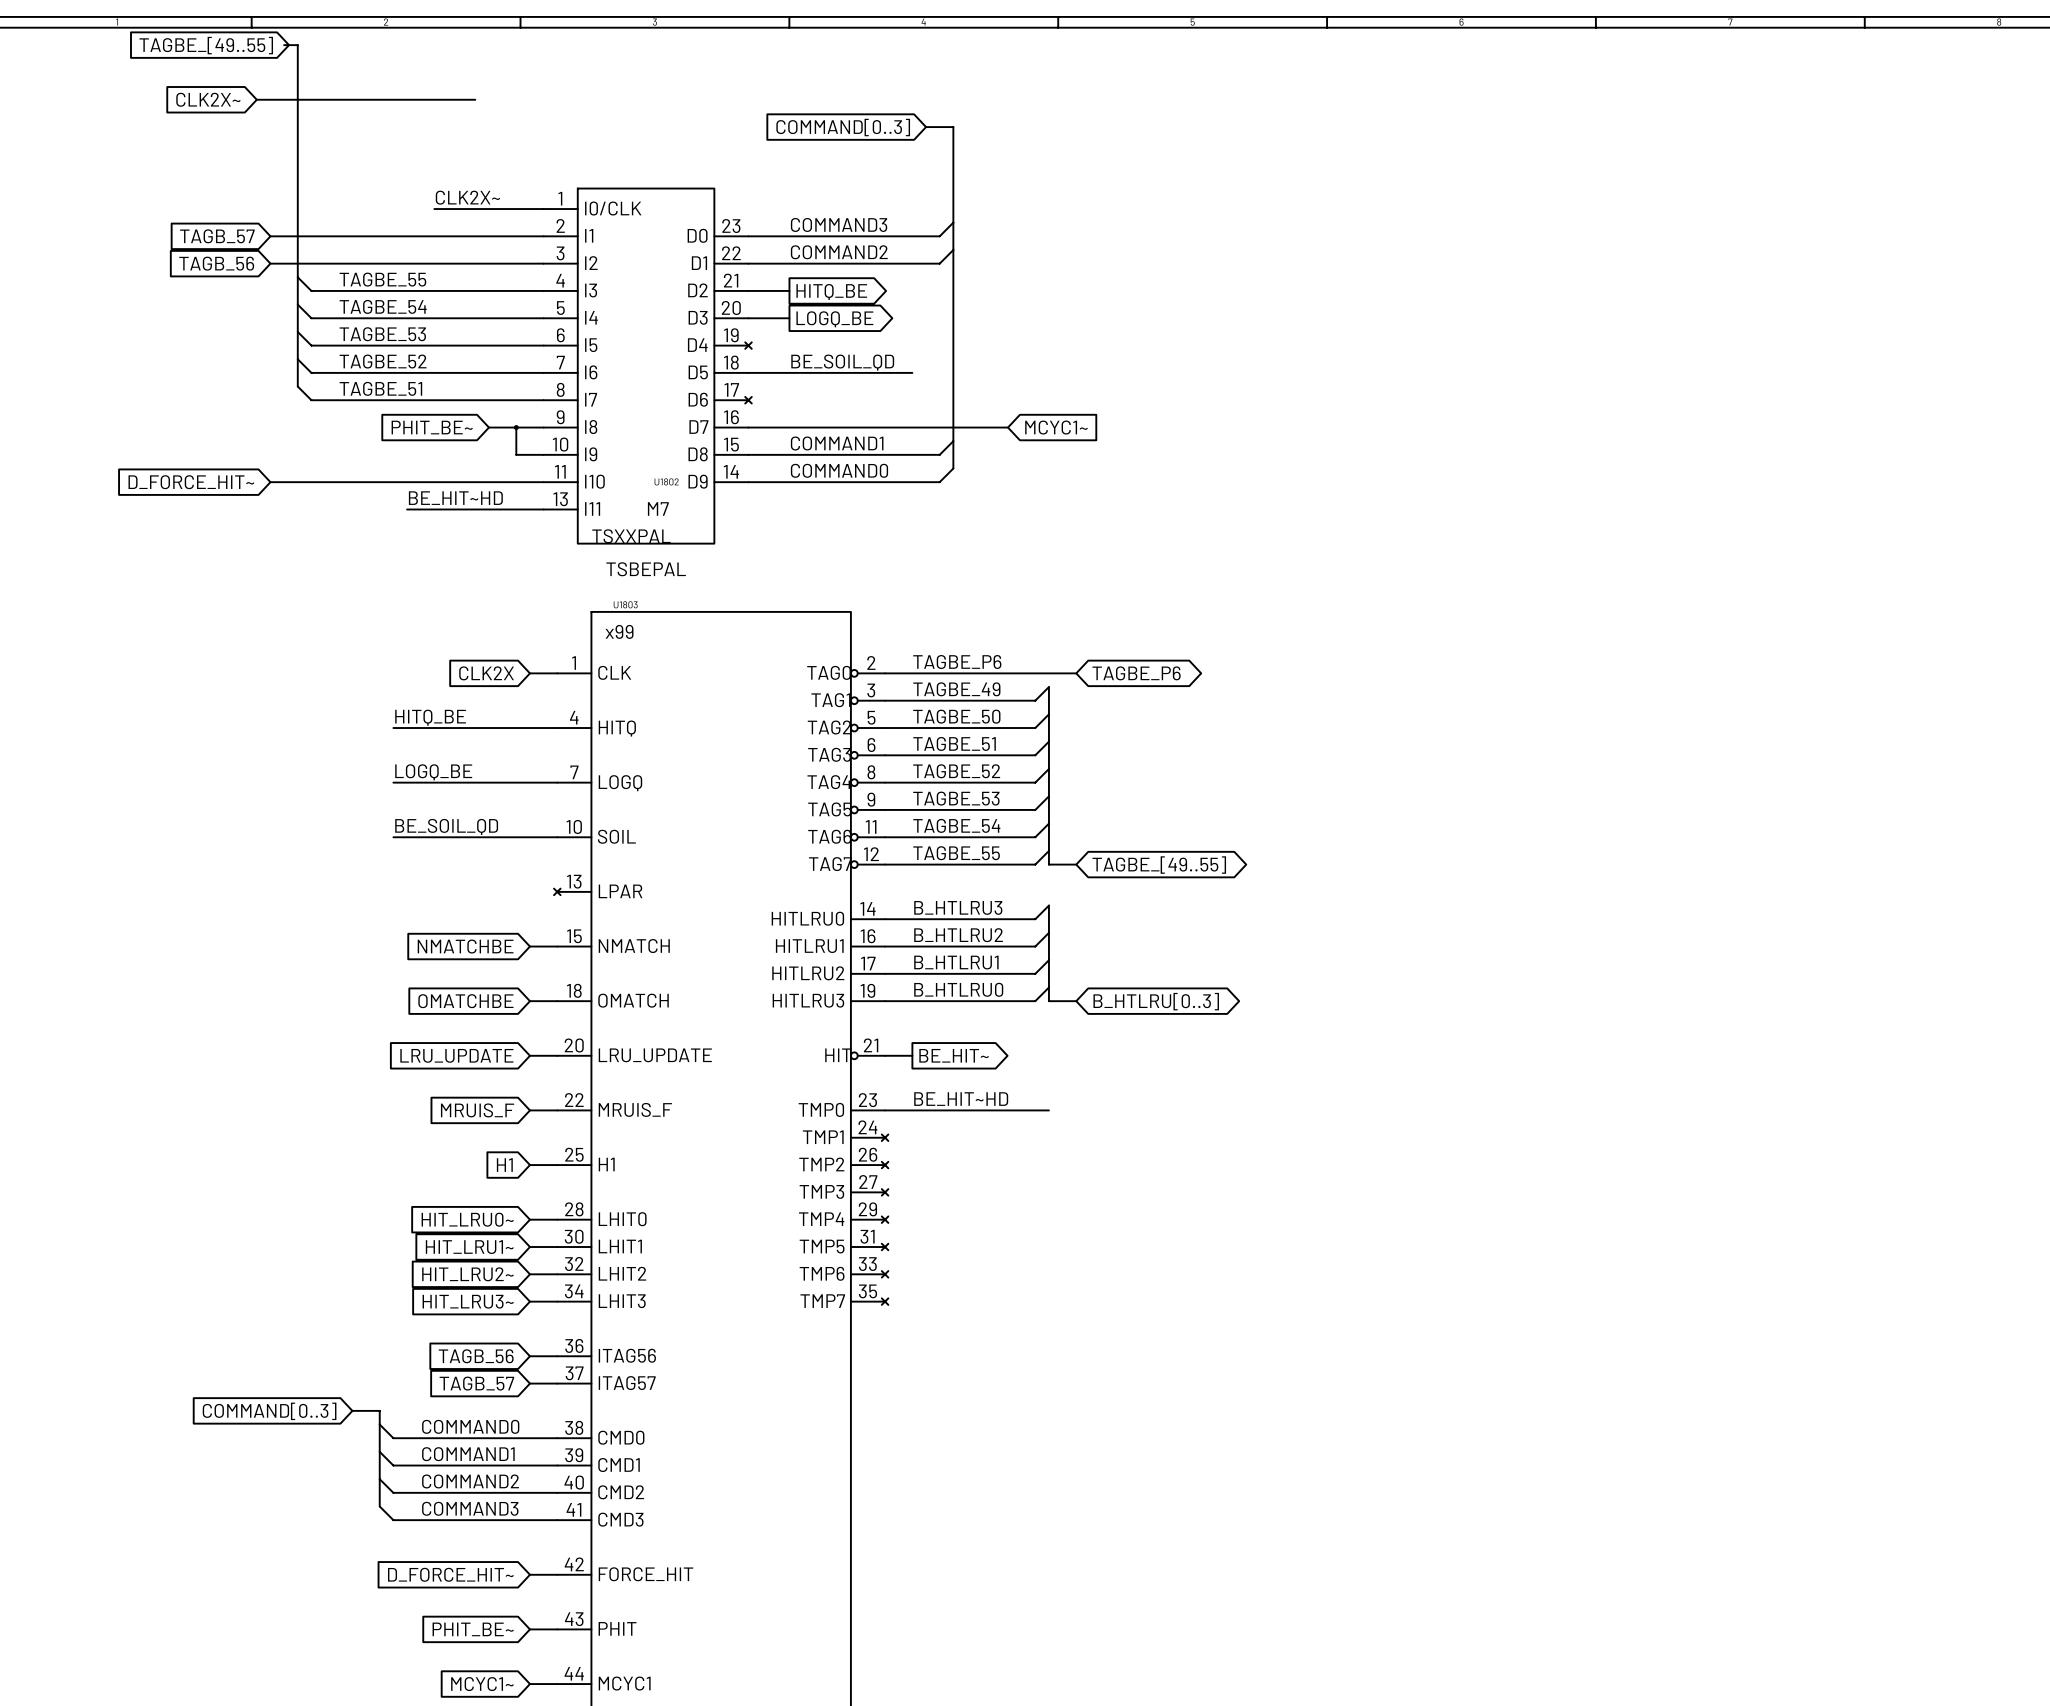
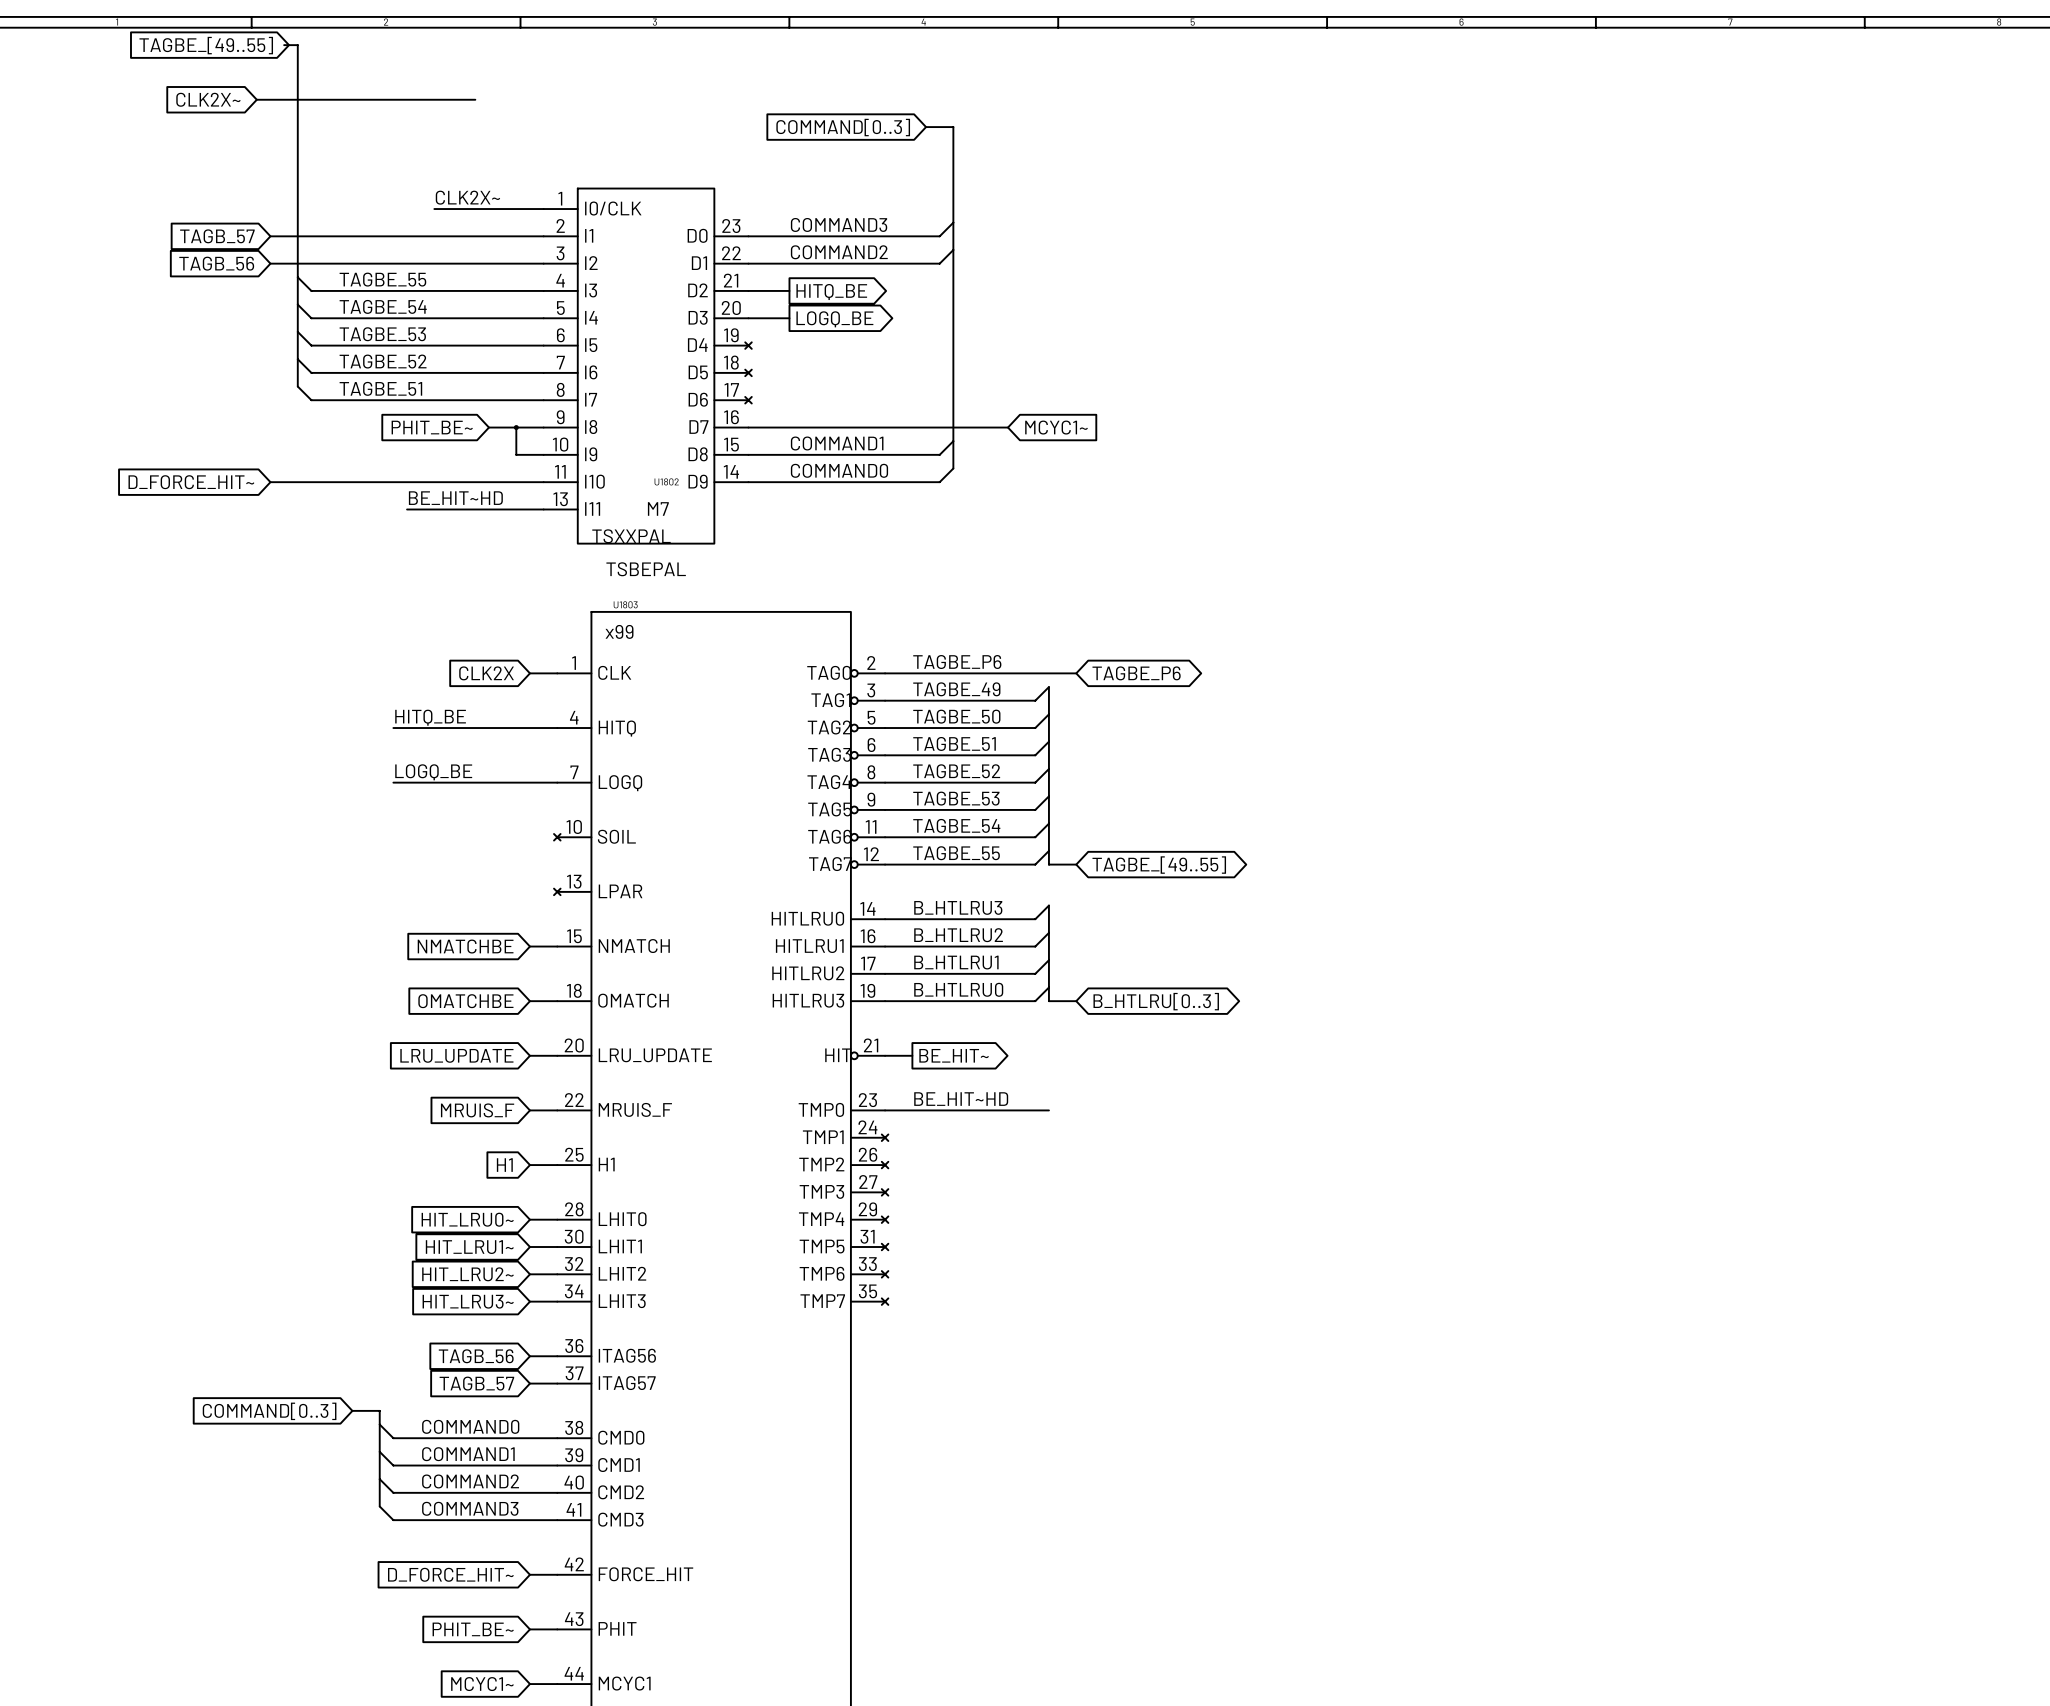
label: BE_SOIL_QD (842, 362) -> none
wire: (748, 372) (912, 372) -> none
no-connect mark: none -> (748, 372)
label: BE_SOIL_QD (446, 826) -> none
wire: (393, 837) (557, 837) -> none
no-connect mark: none -> (557, 837)

